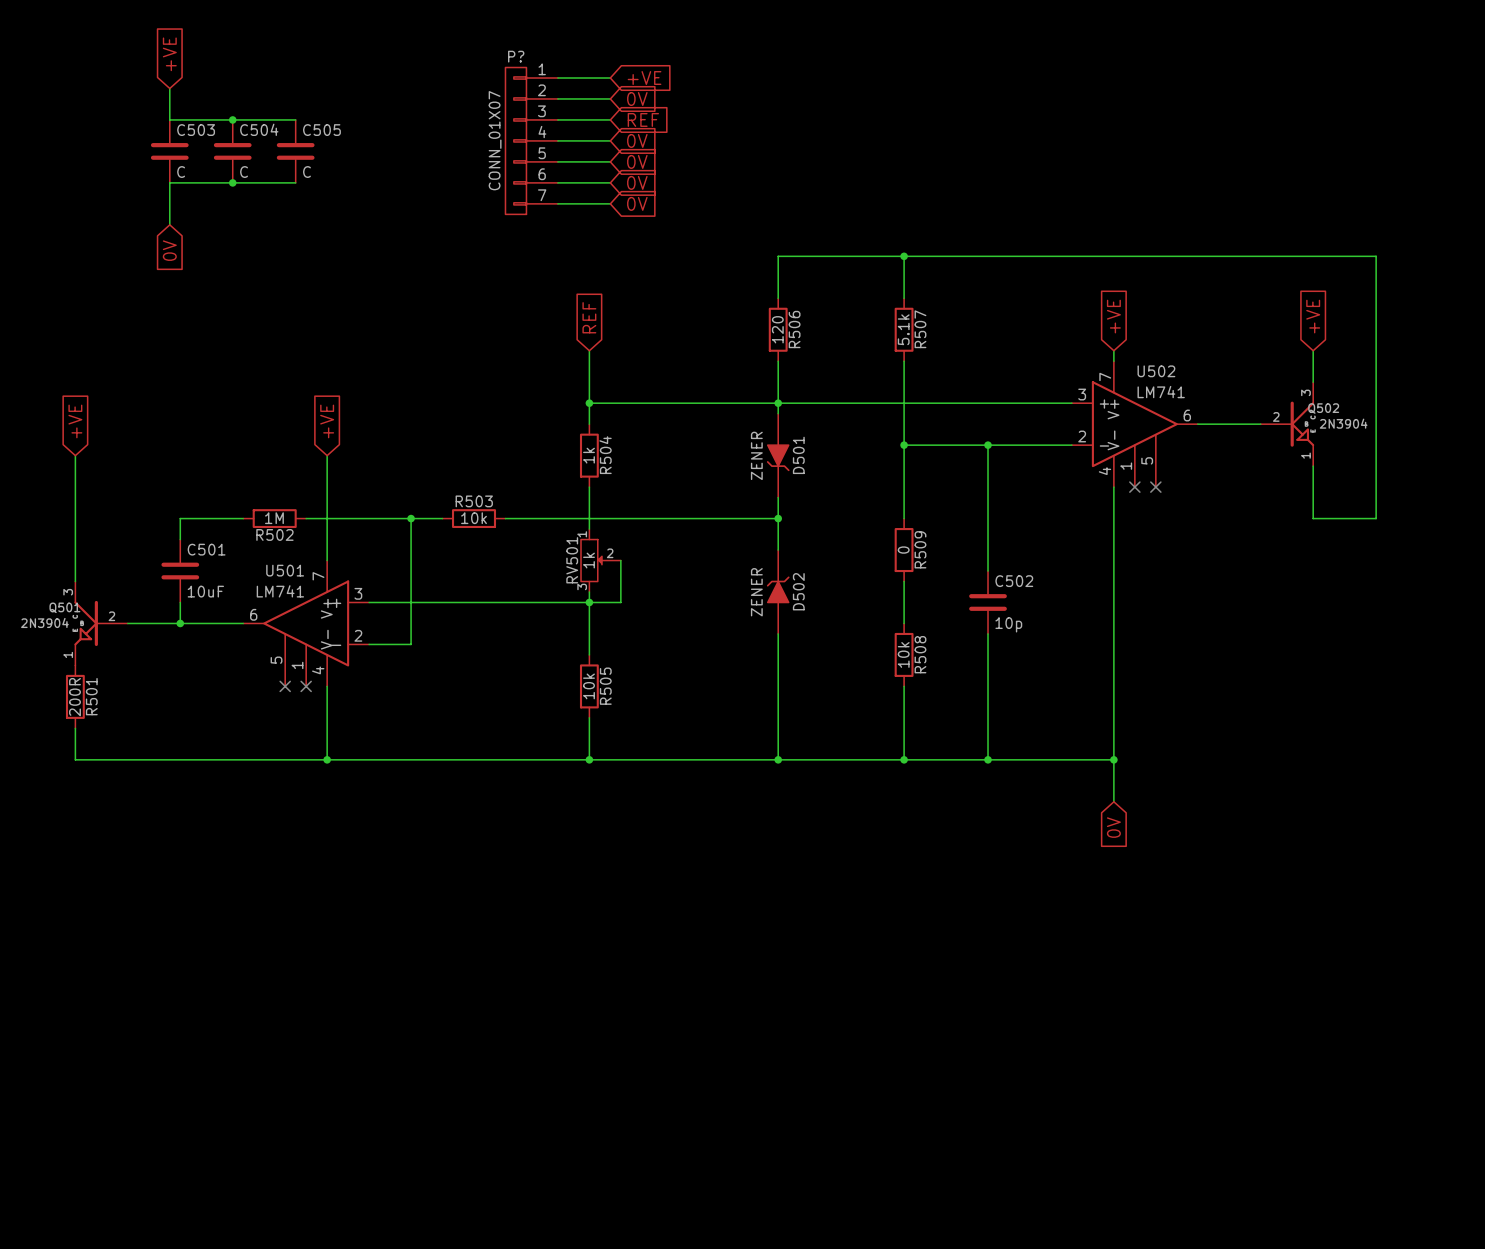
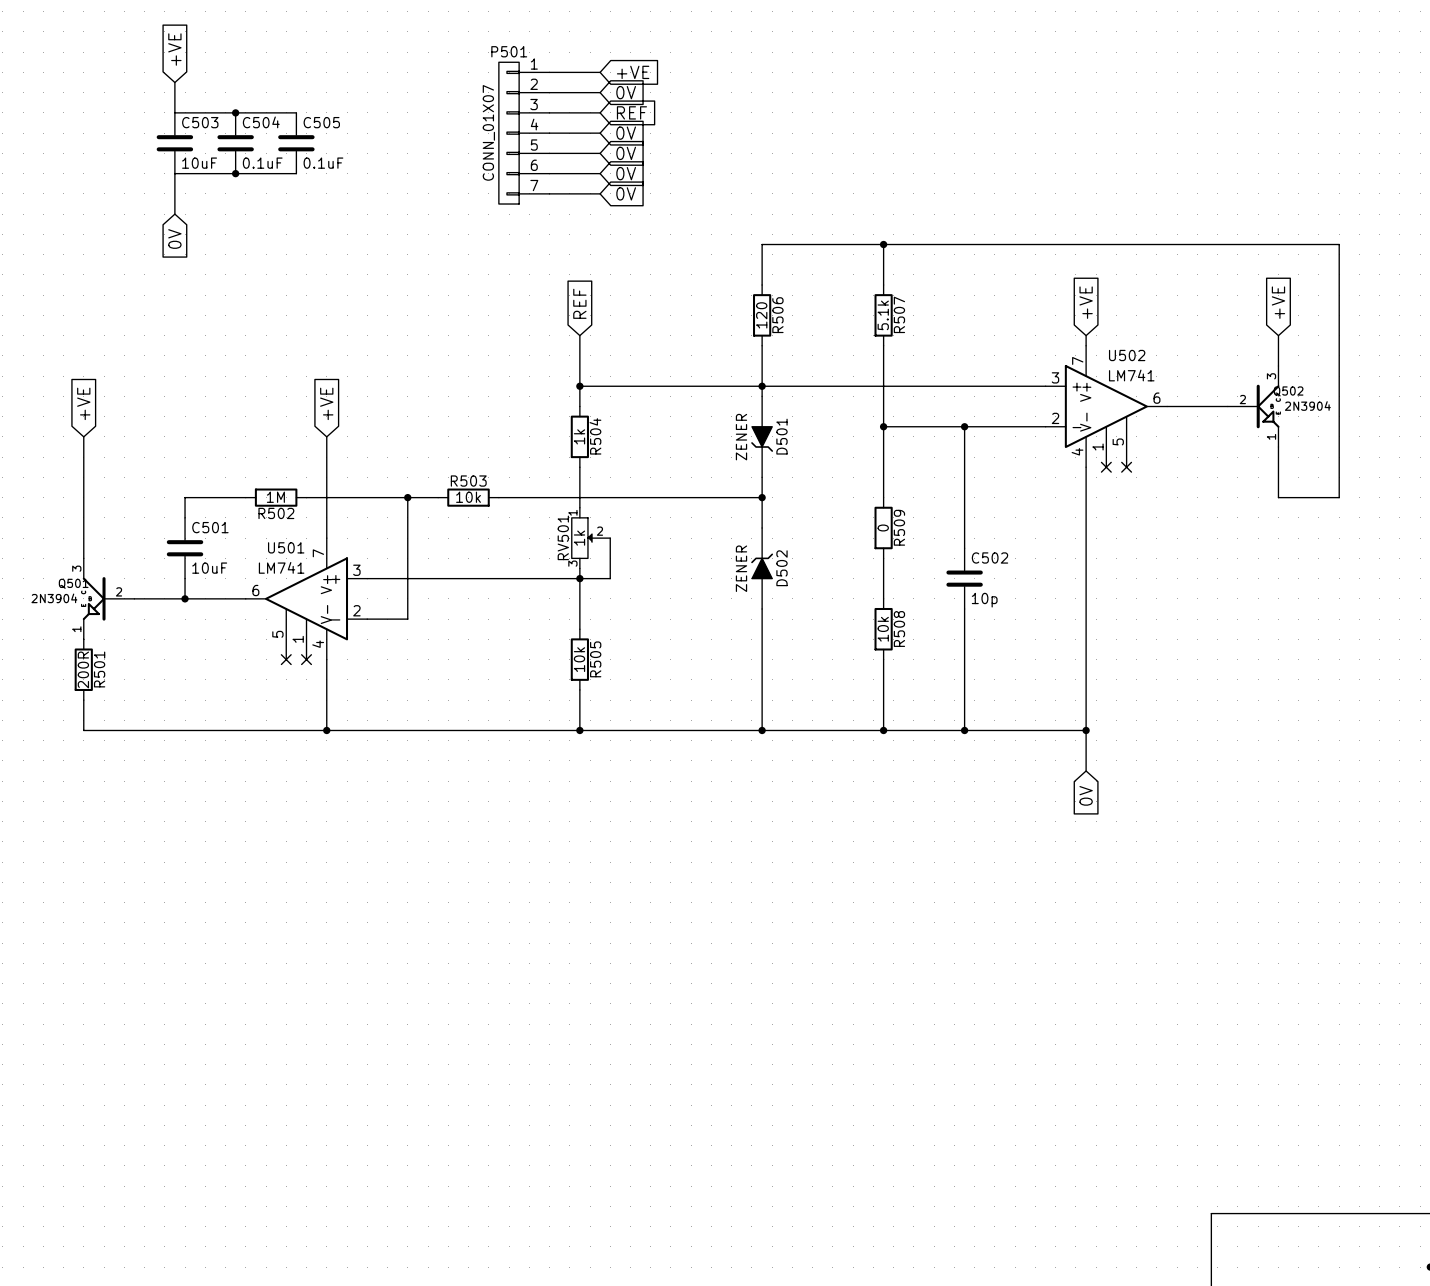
P? name: P? (516, 56) -> P501 (509, 51)
C503 value: C (181, 172) -> 10uF (199, 163)
C504 value: C (244, 172) -> 0.1uF (262, 163)
C505 value: C (306, 172) -> 0.1uF (323, 163)

